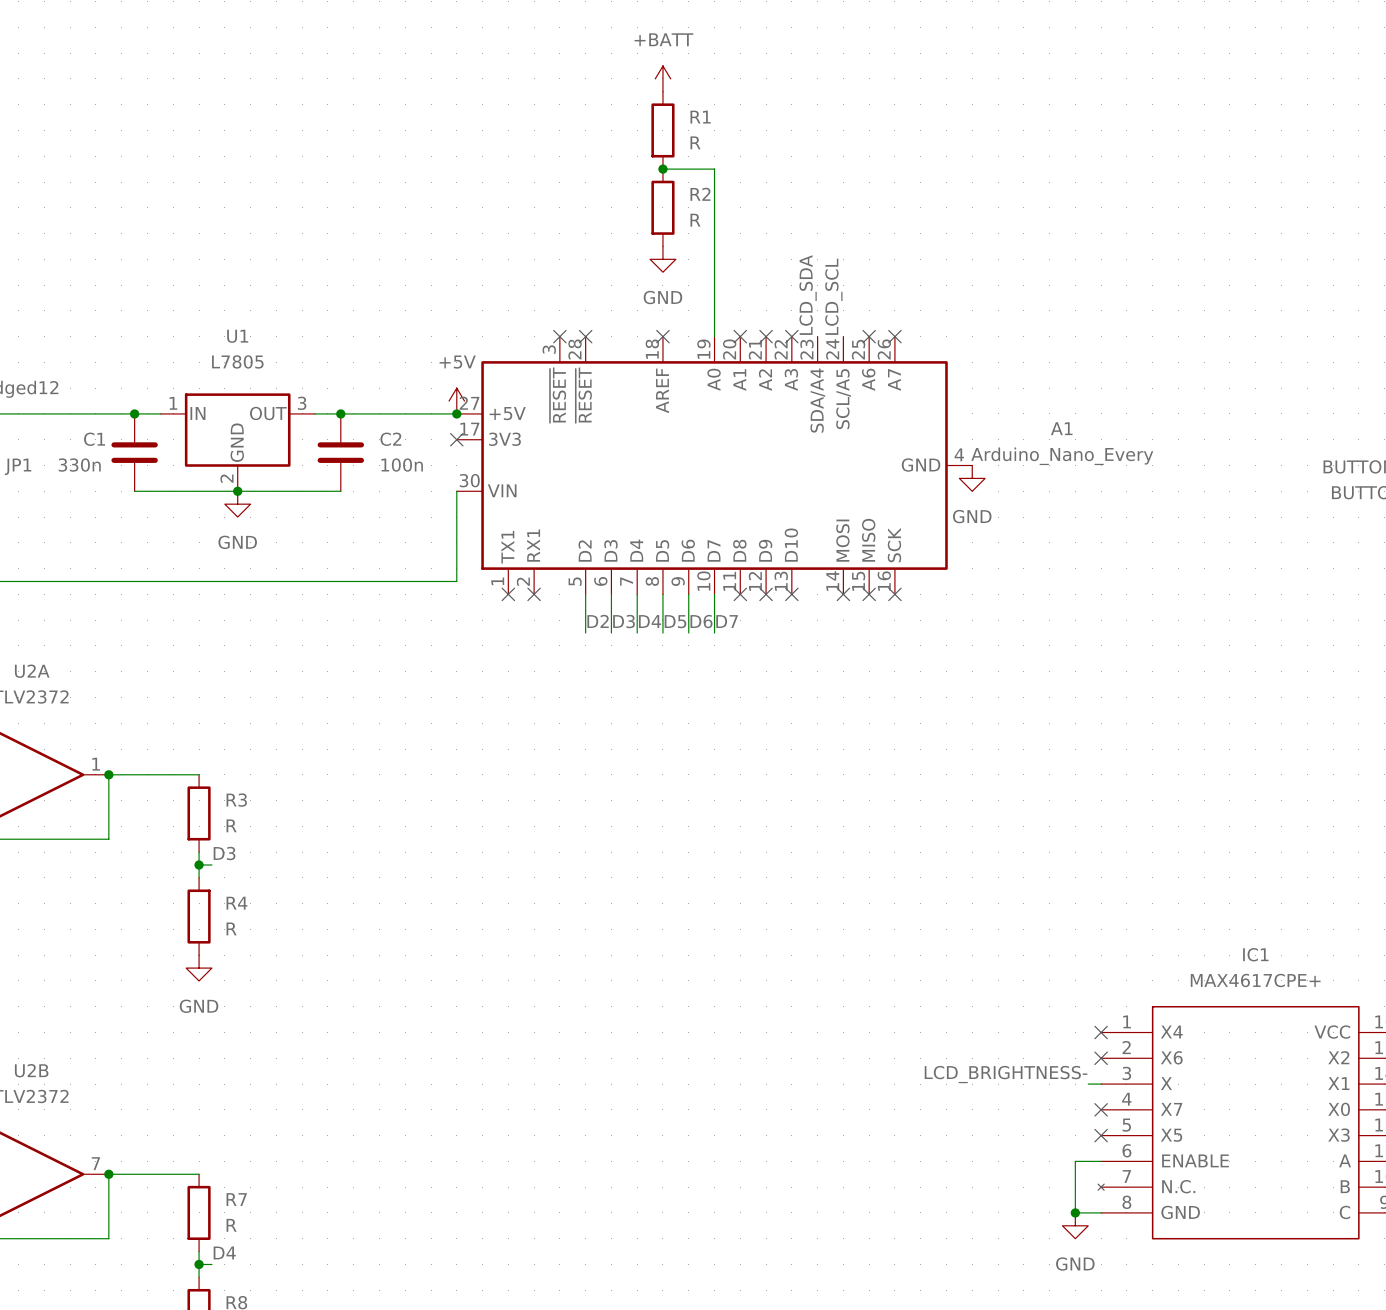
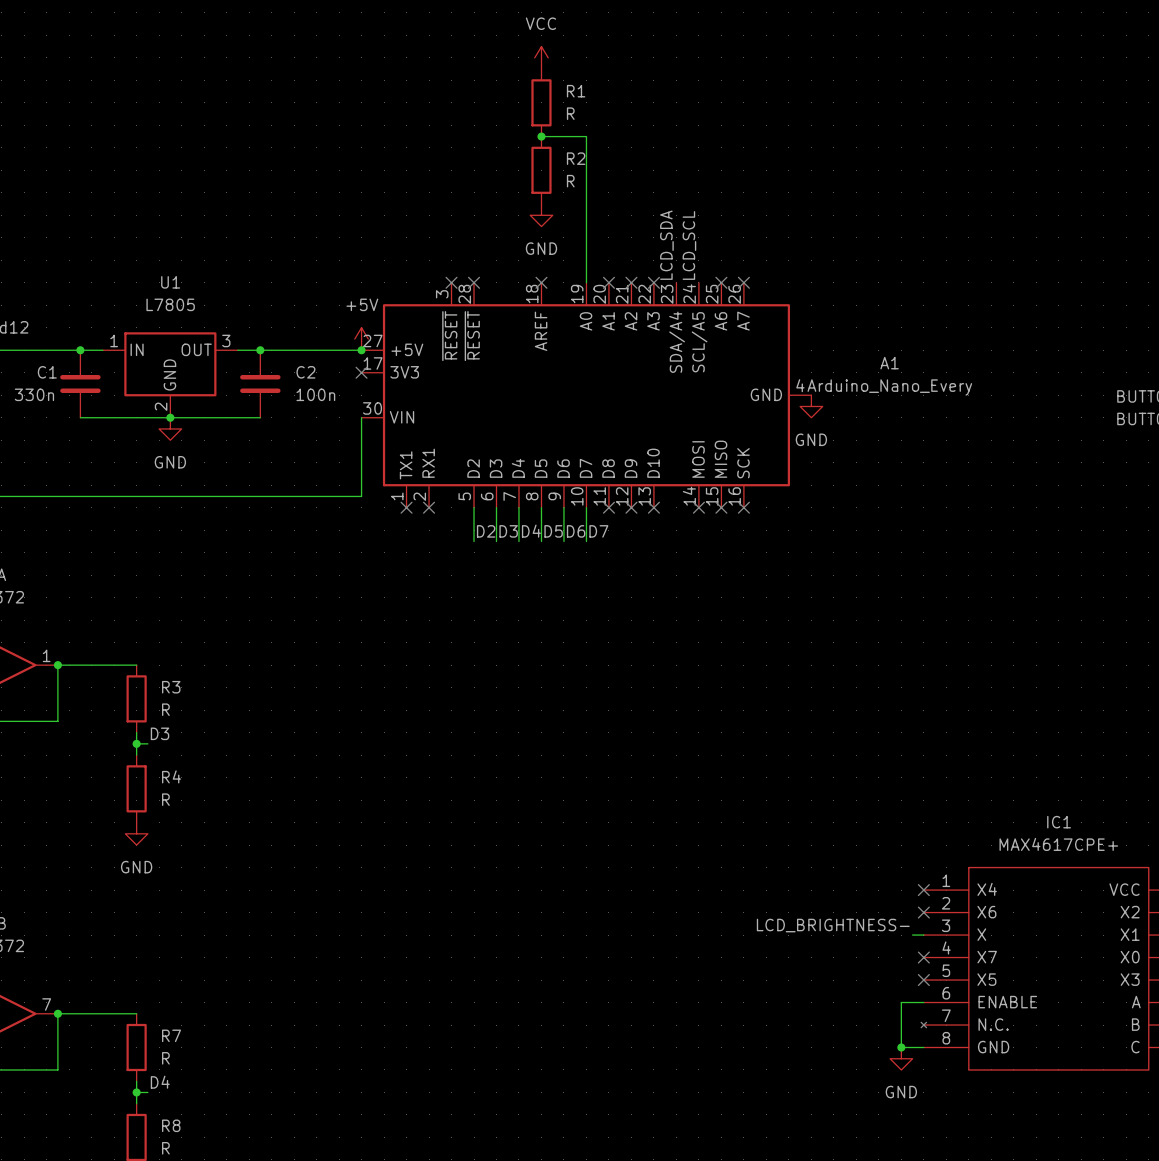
power symbol: +BATT (662, 78) -> VCC (541, 57)

